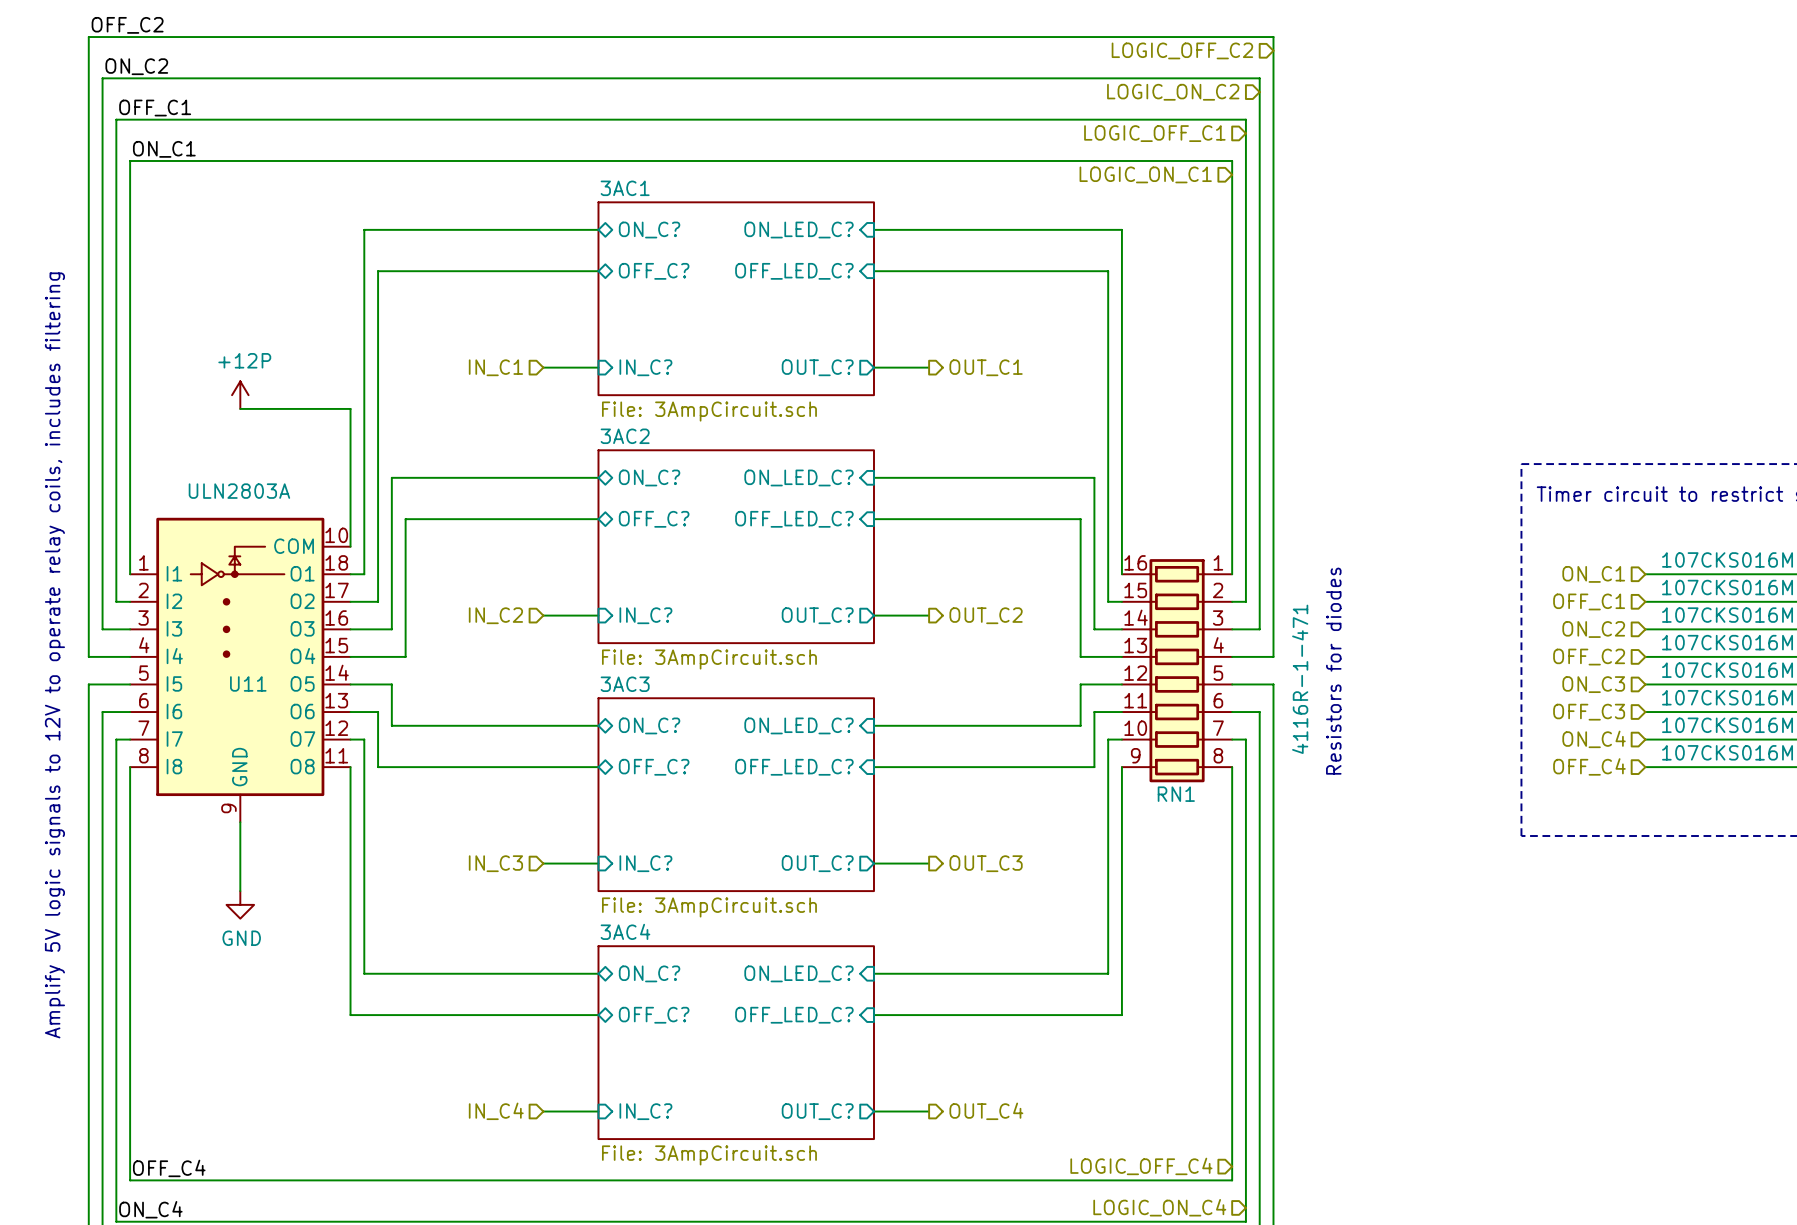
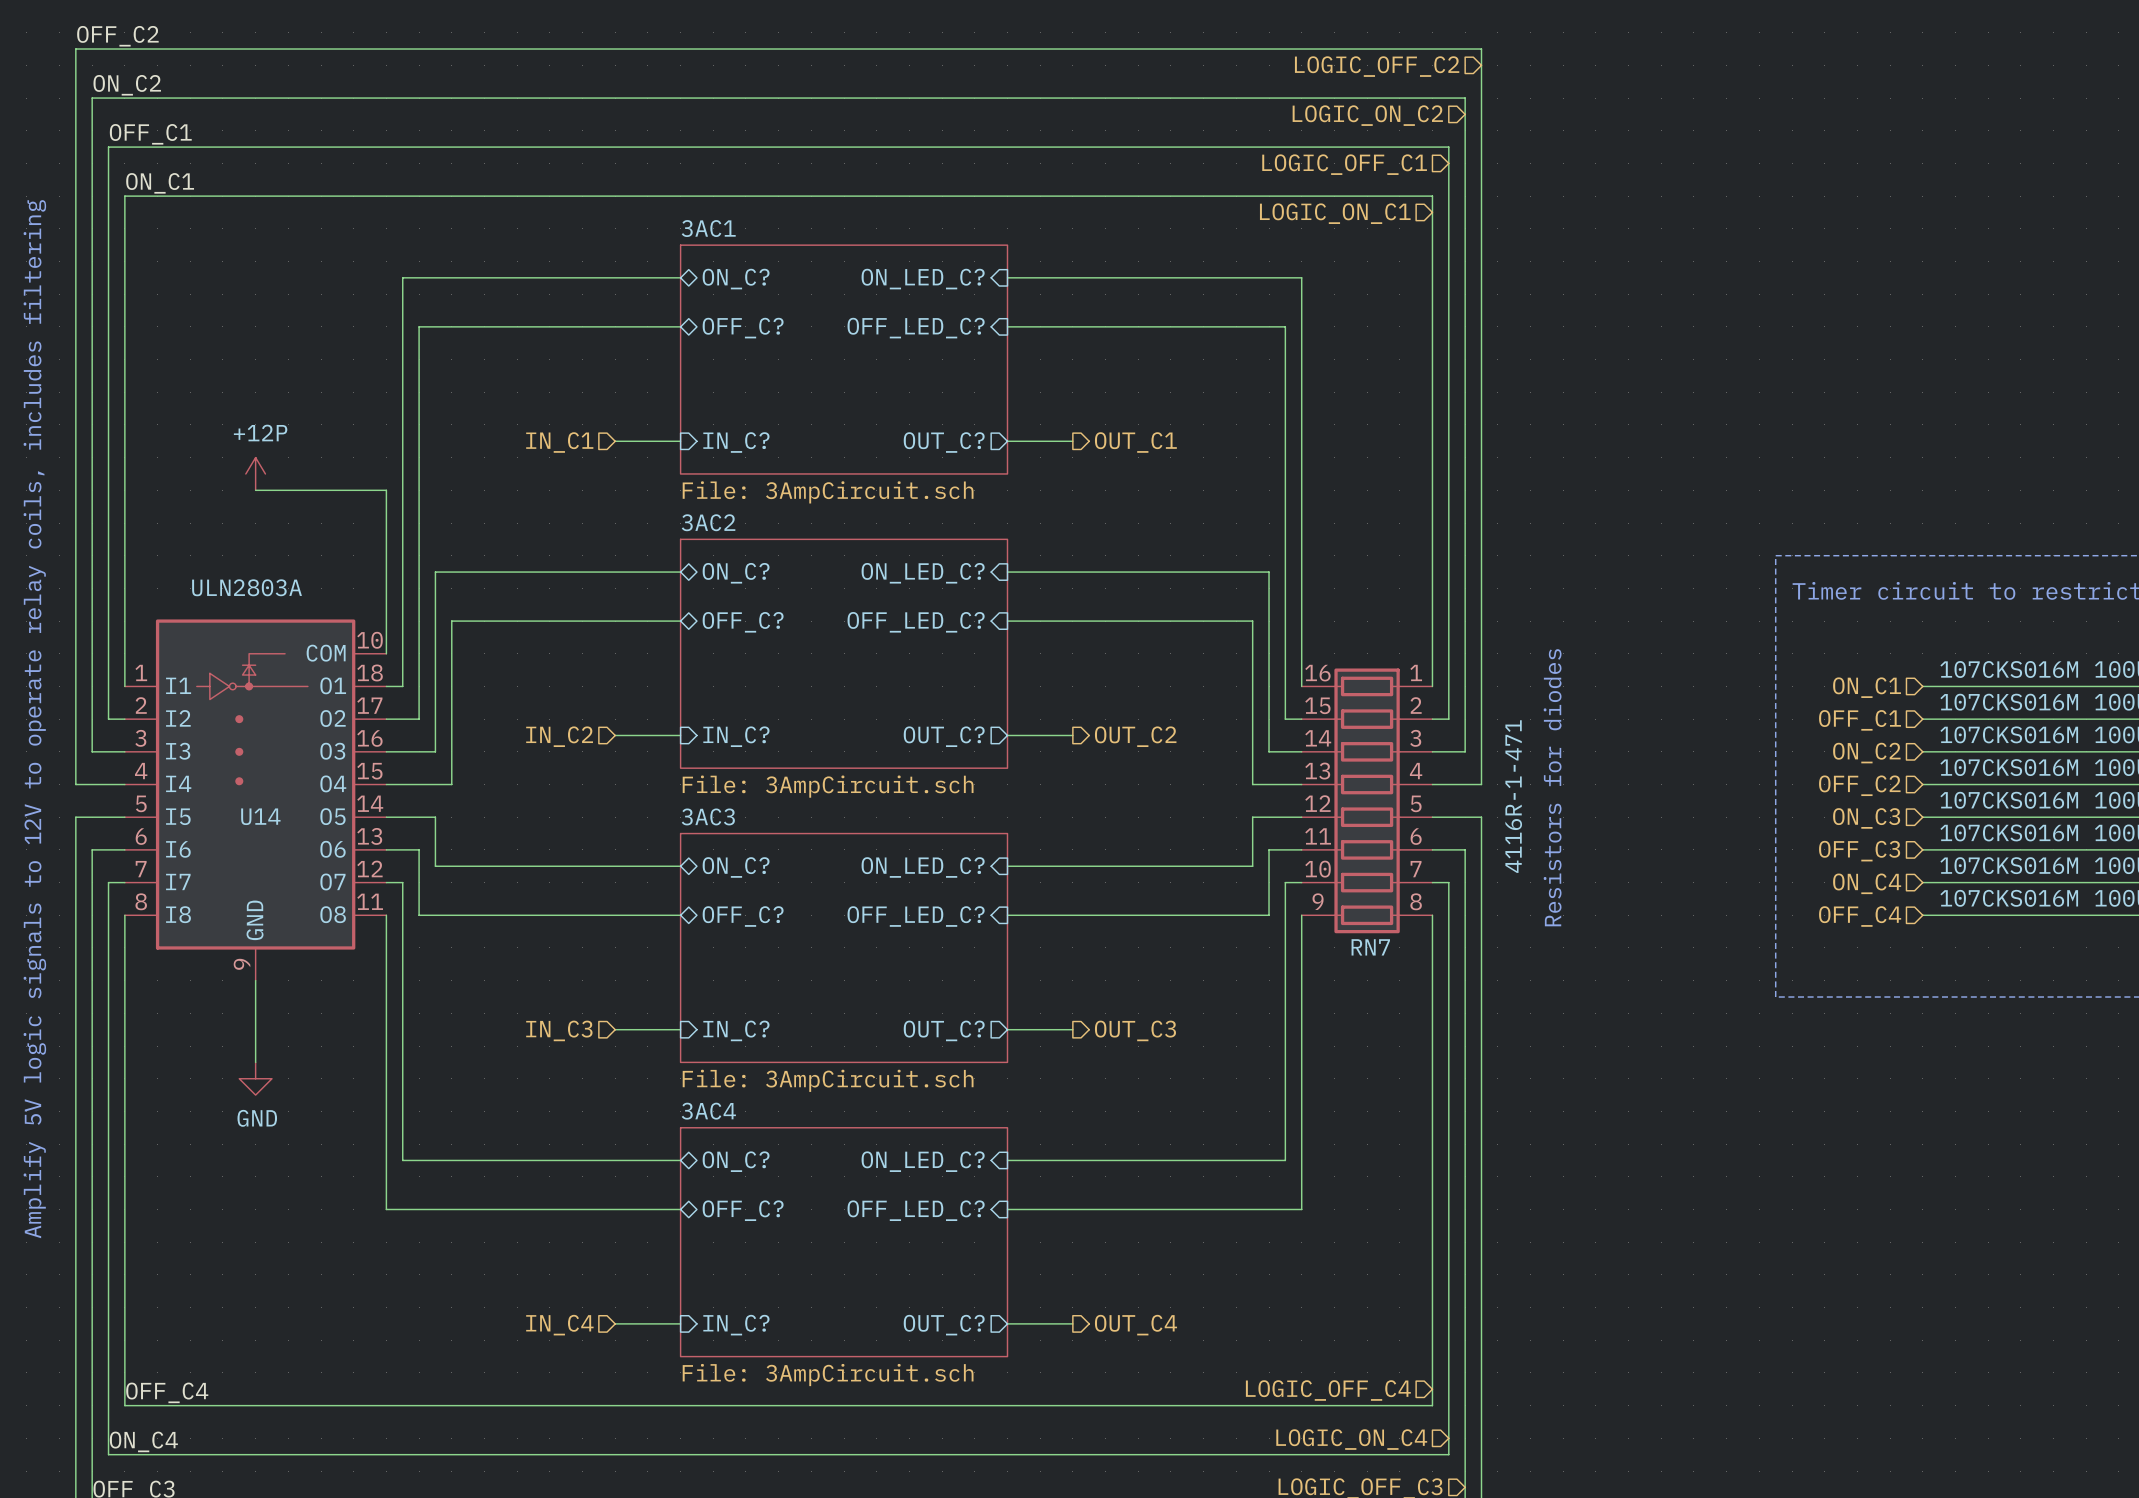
U11 name: U11 (248, 683) -> U14 (260, 816)
RN1 name: RN1 (1176, 794) -> RN7 (1370, 947)

